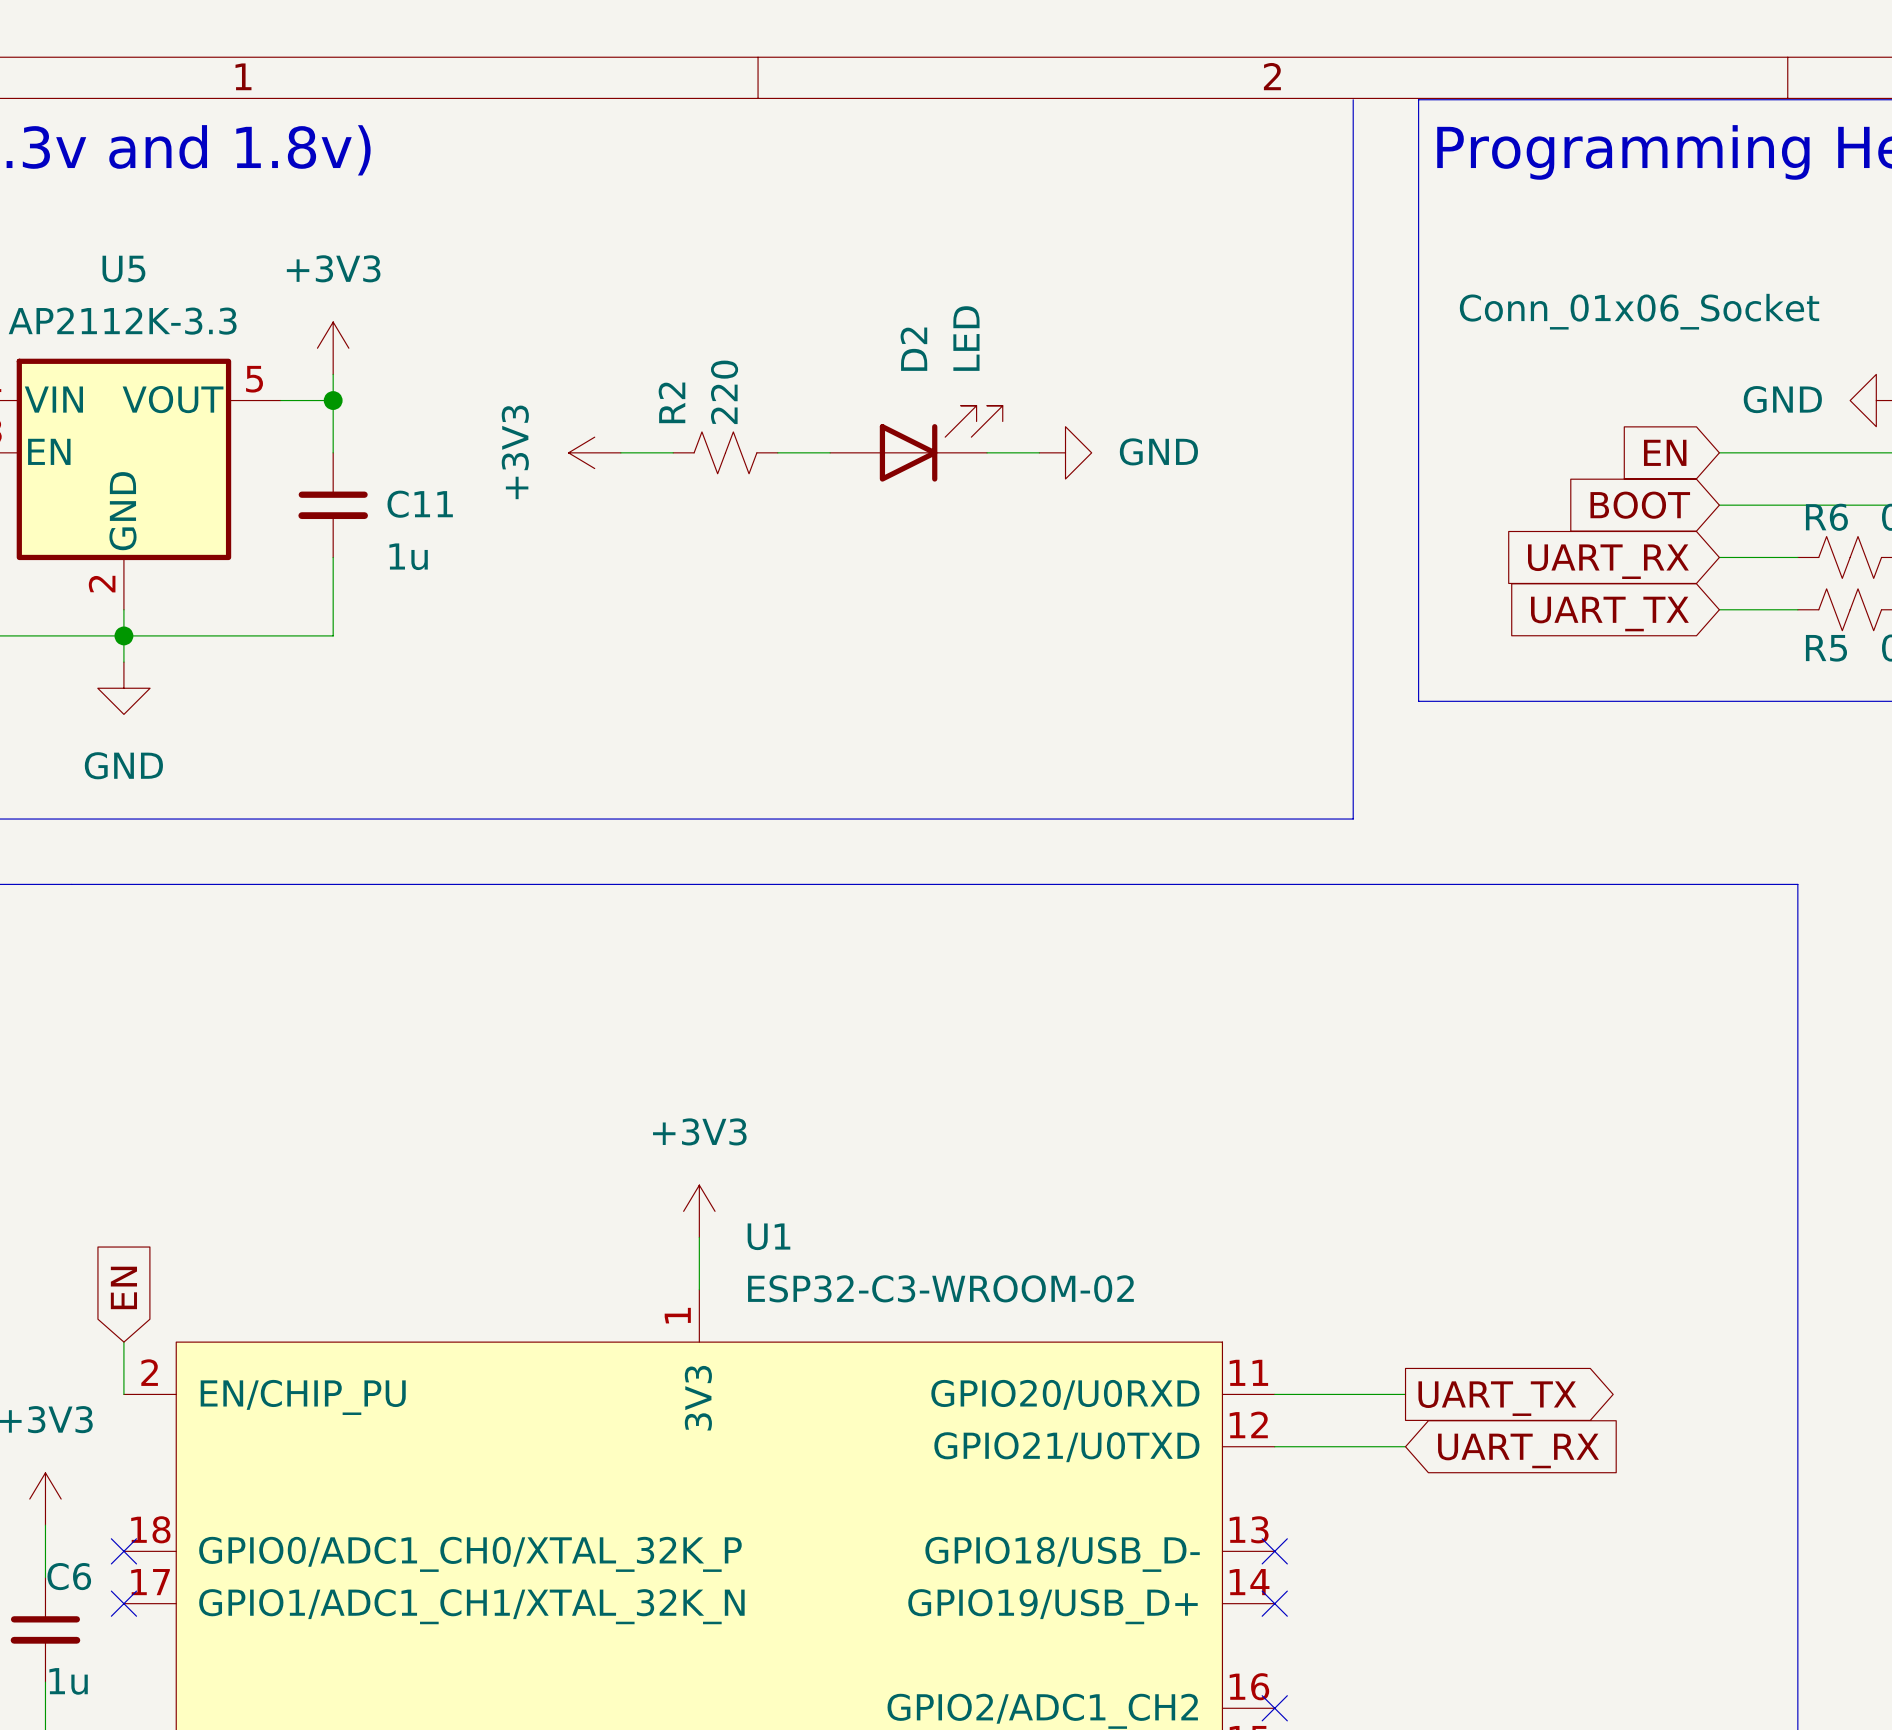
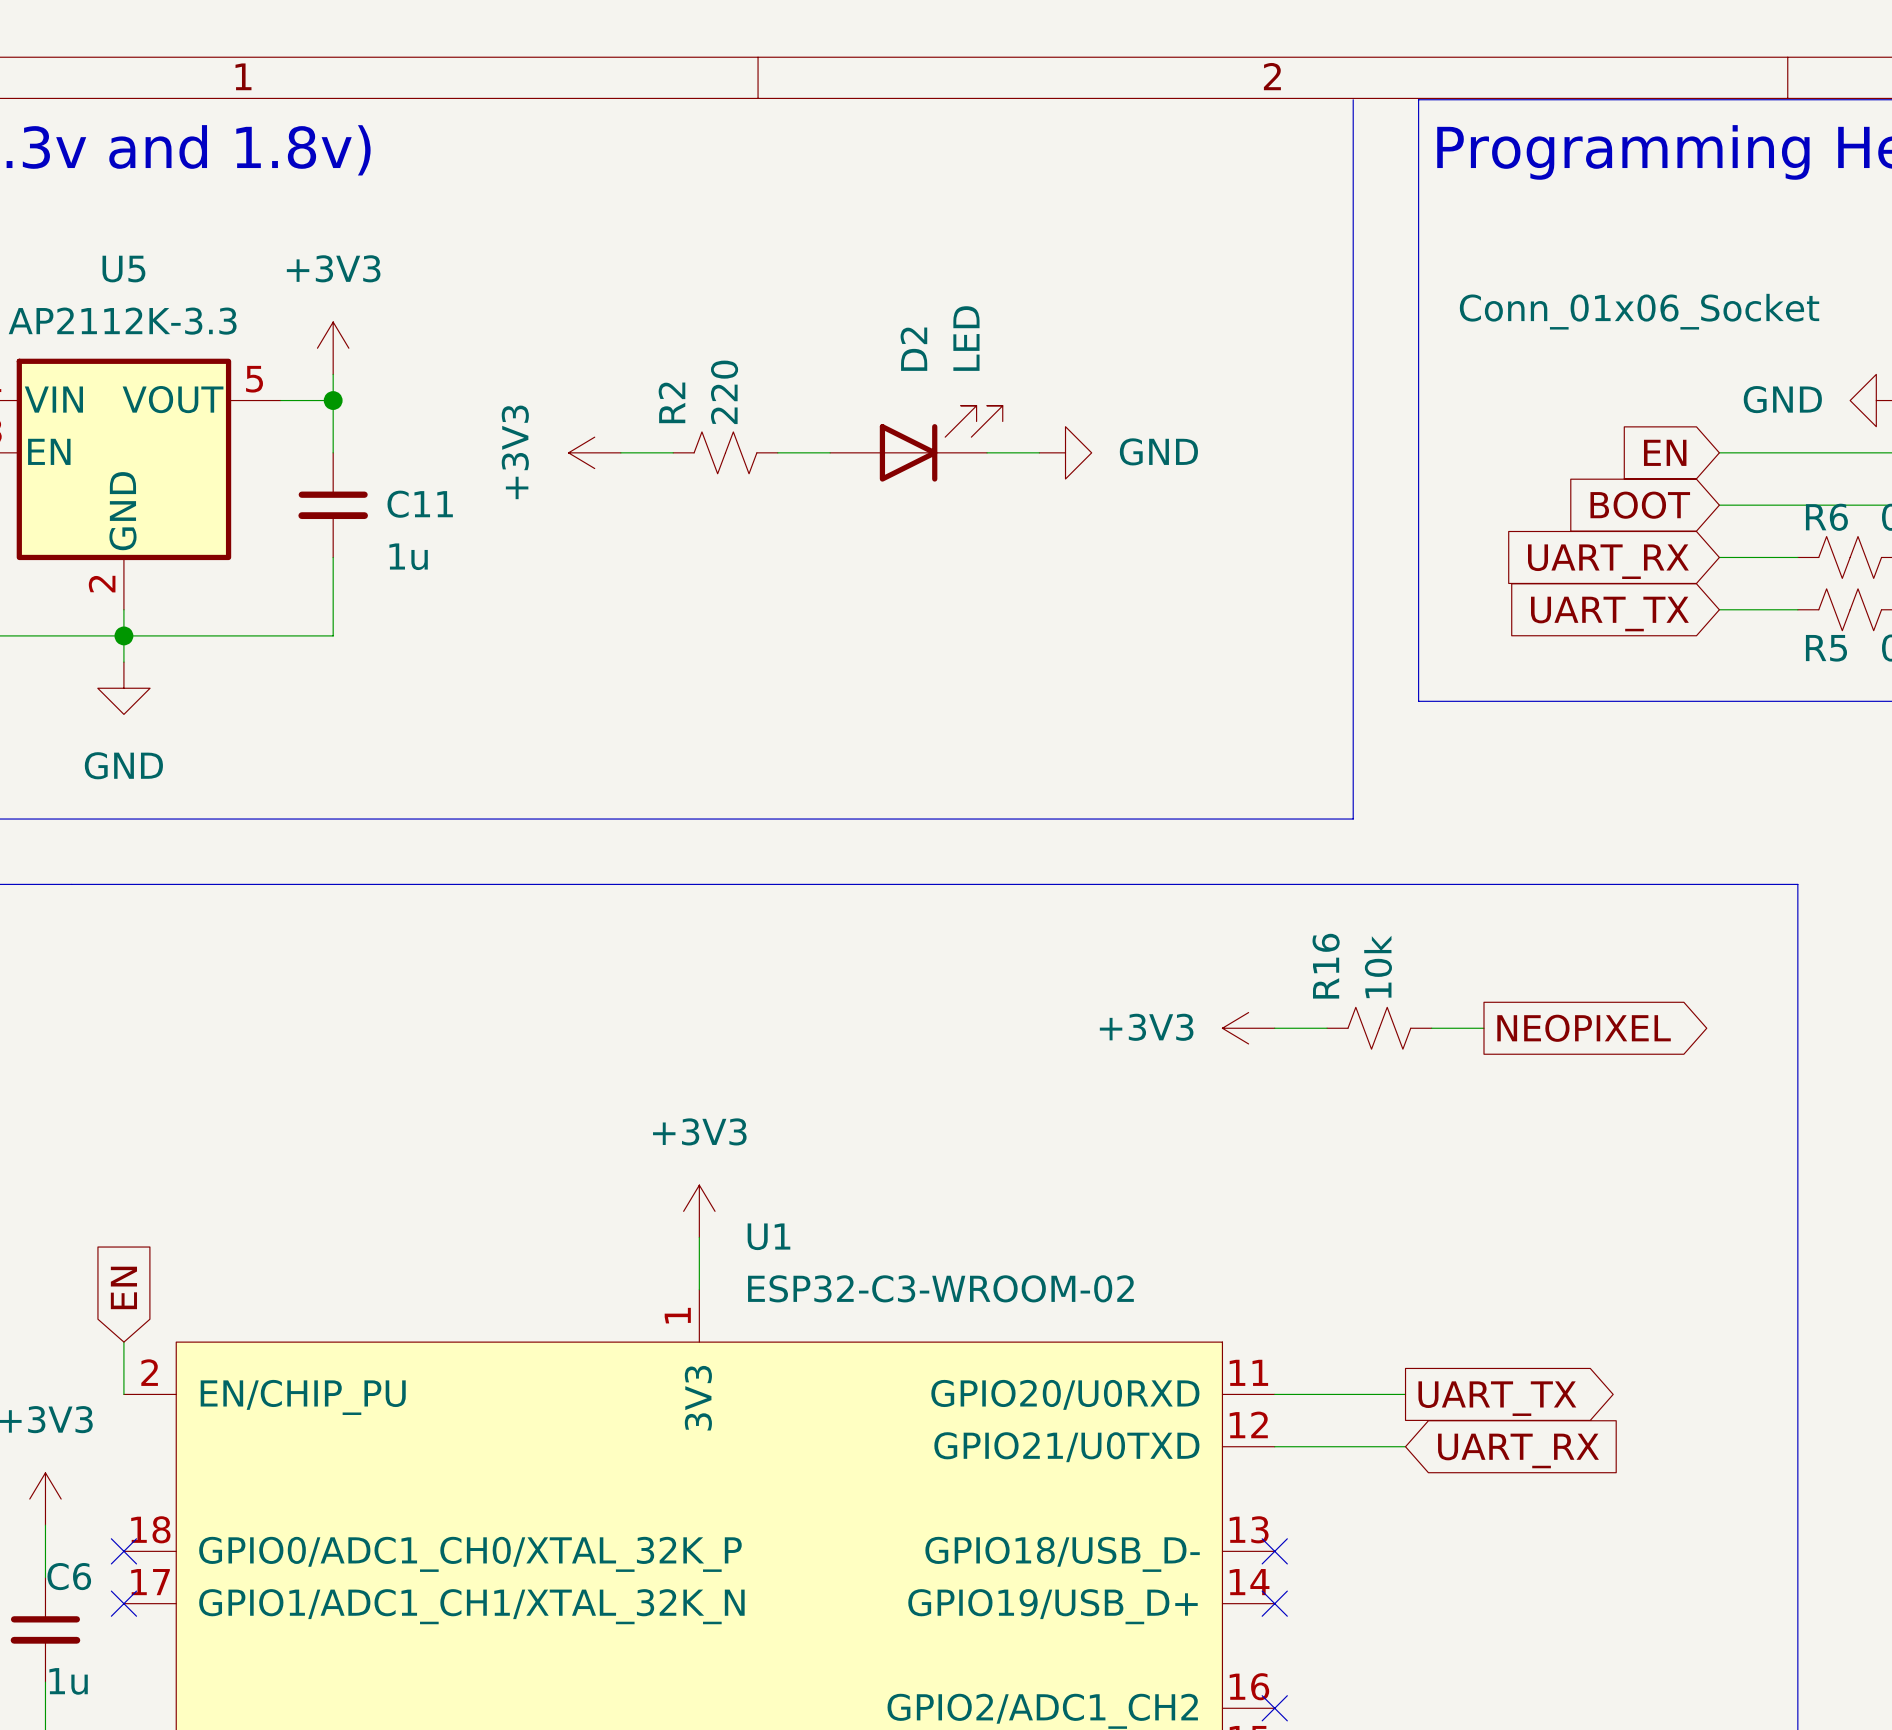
power symbol: none -> +3V3 (1248, 1028)
wire: none -> (1274, 1028) (1327, 1028)
R16: none -> 10k (1379, 1028)
wire: none -> (1431, 1028) (1483, 1028)
global label: none -> NEOPIXEL (1584, 1028)

